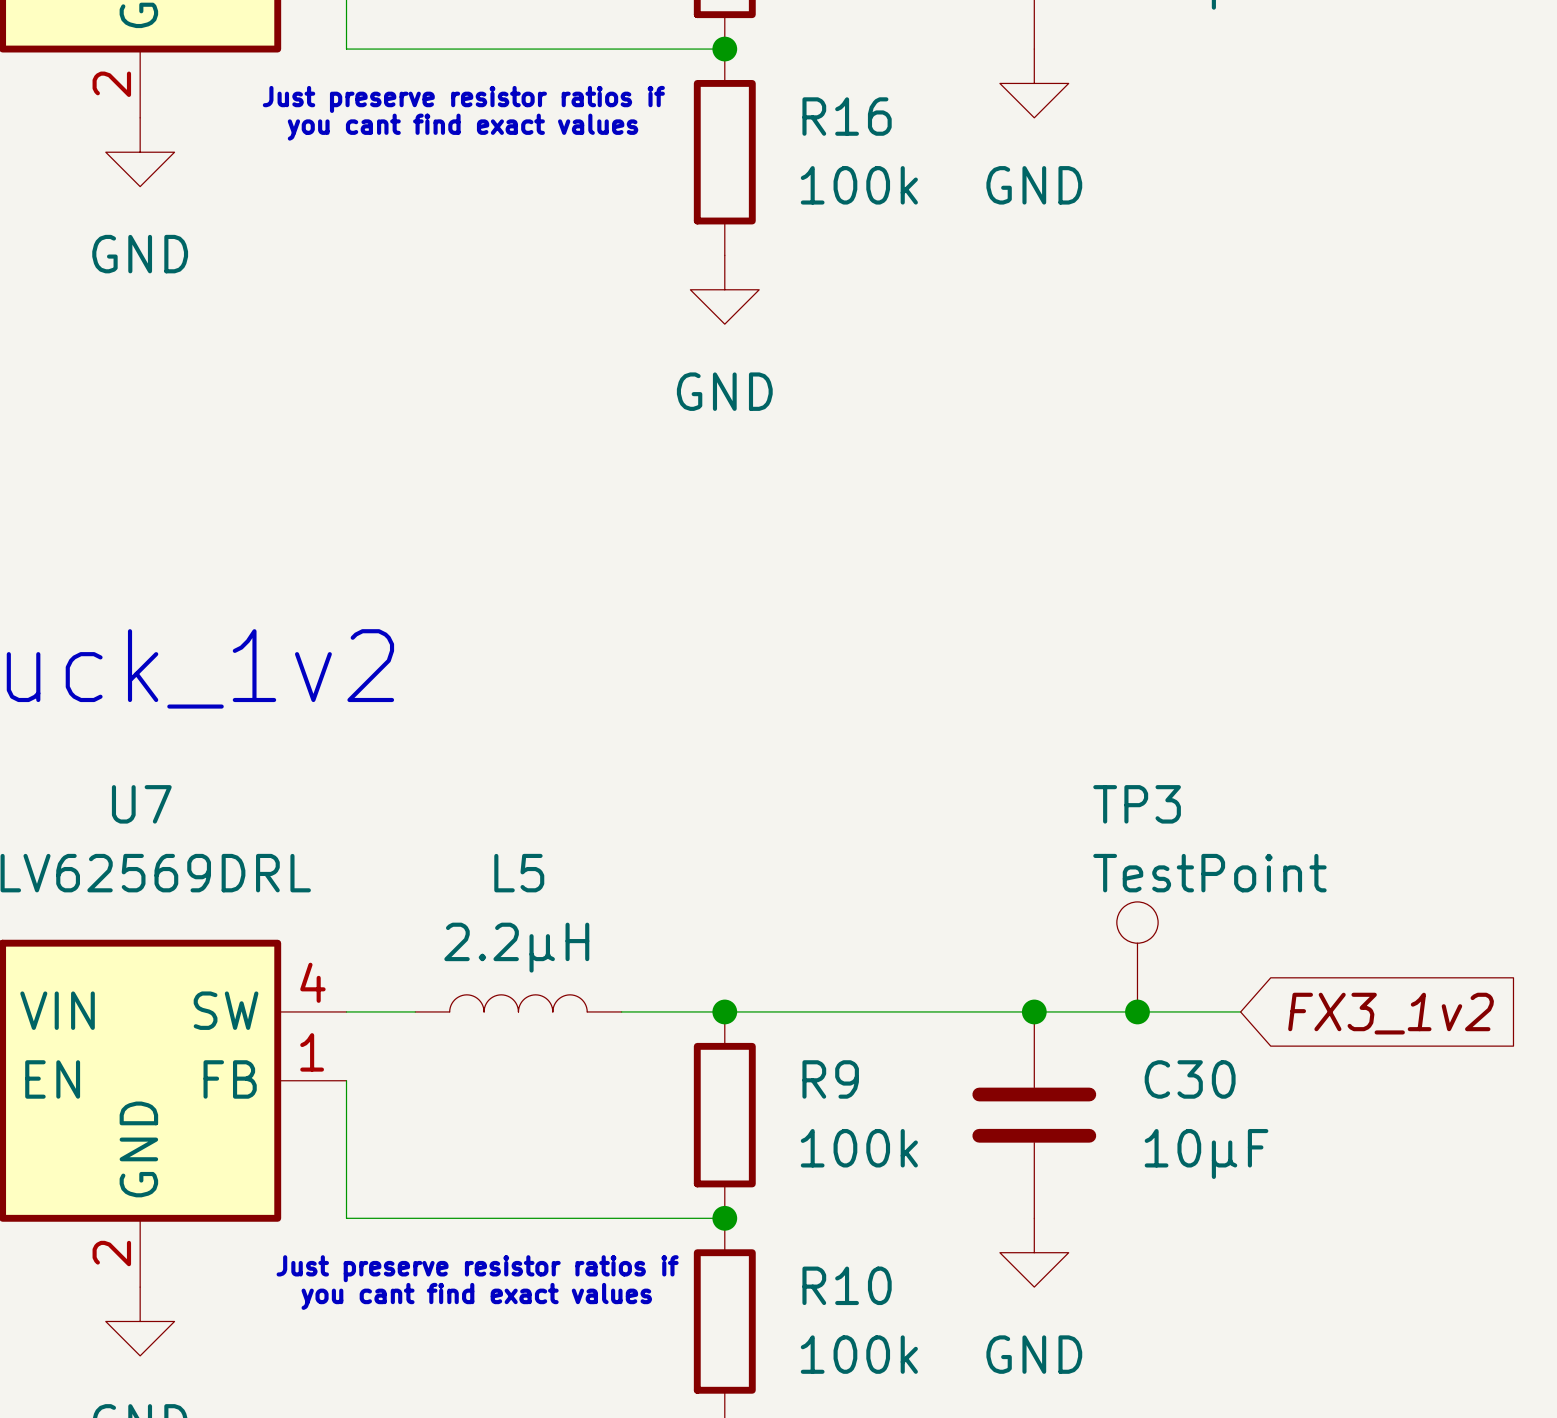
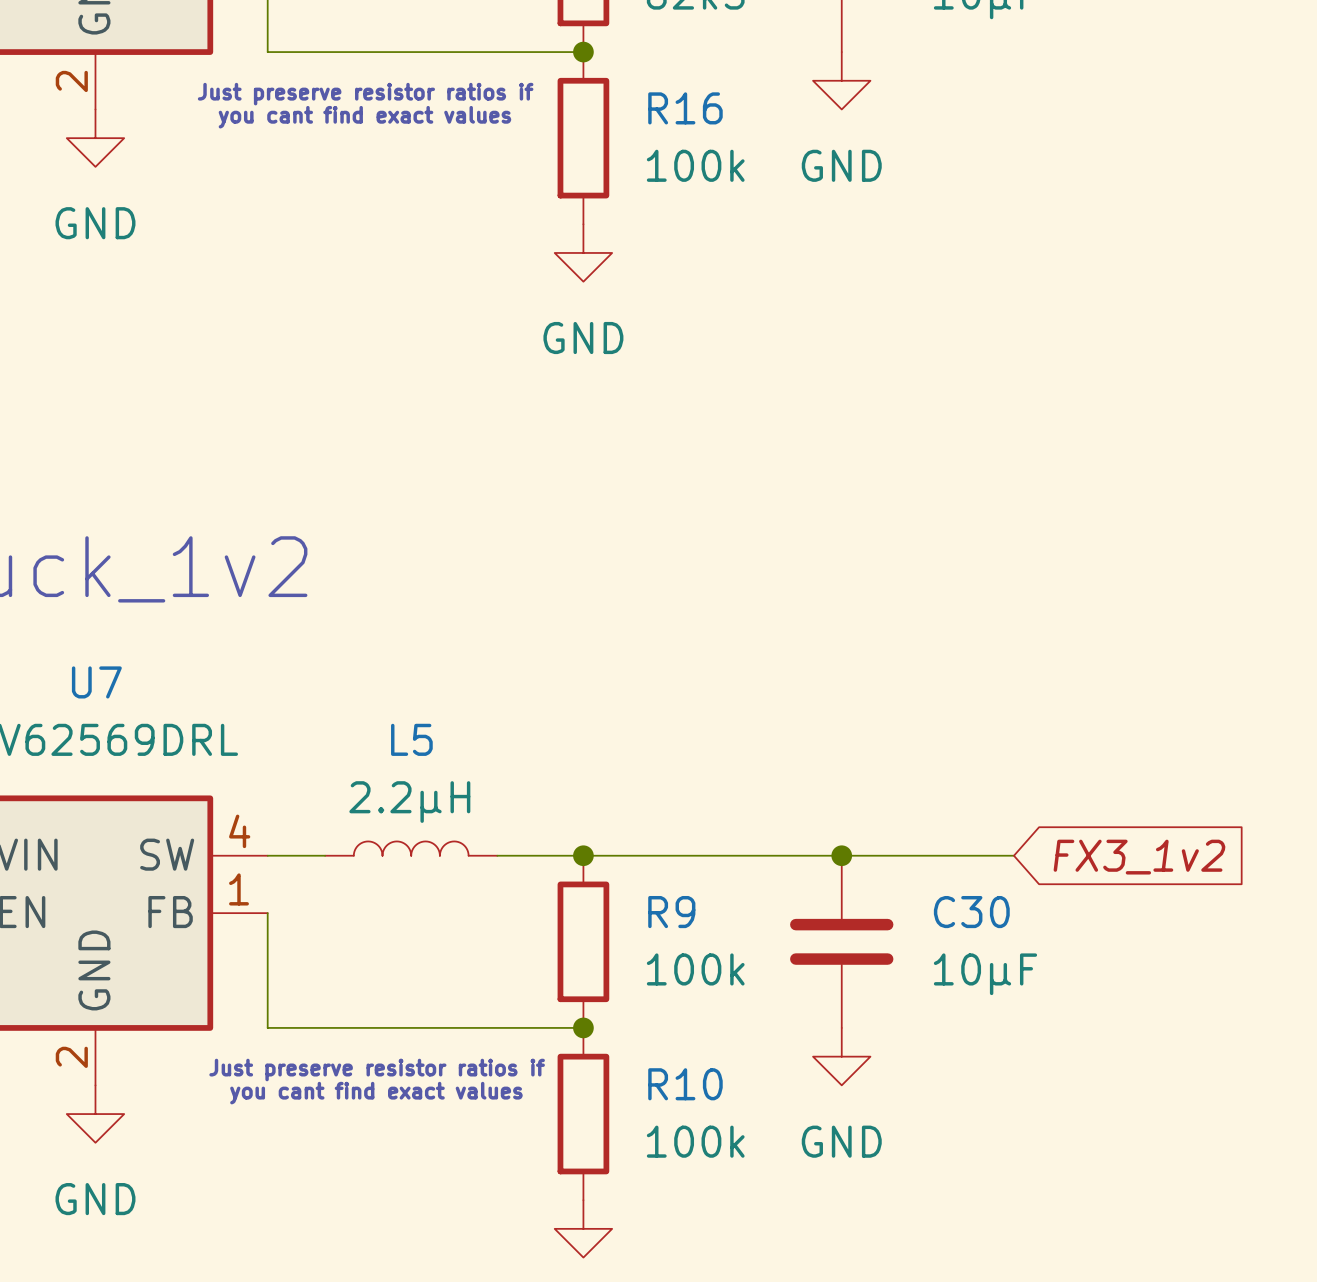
TP3: TestPoint (1137, 956) -> none
junction: (1137, 1011) -> none

